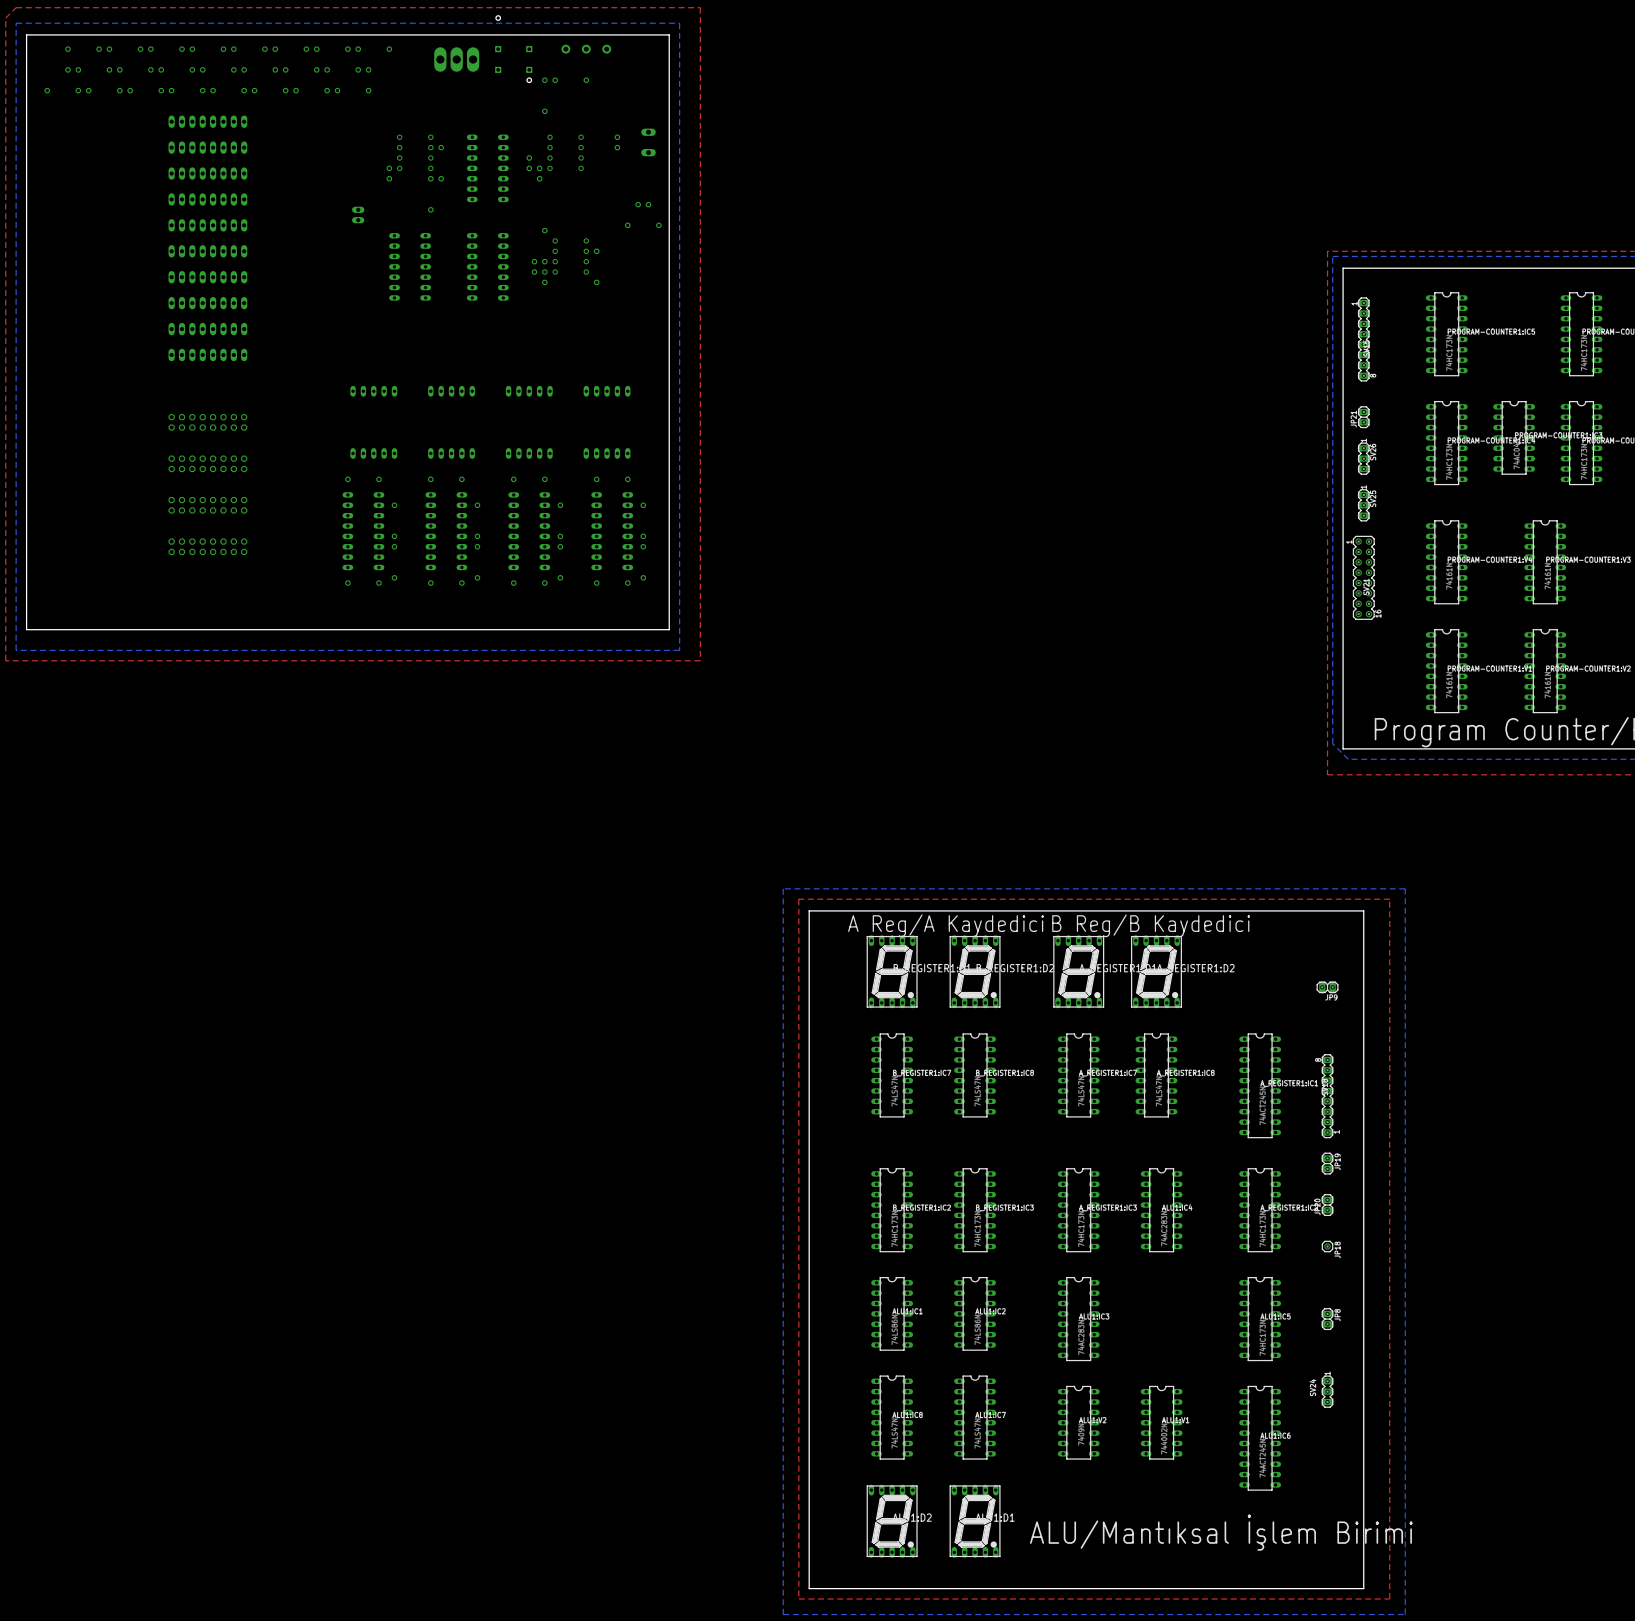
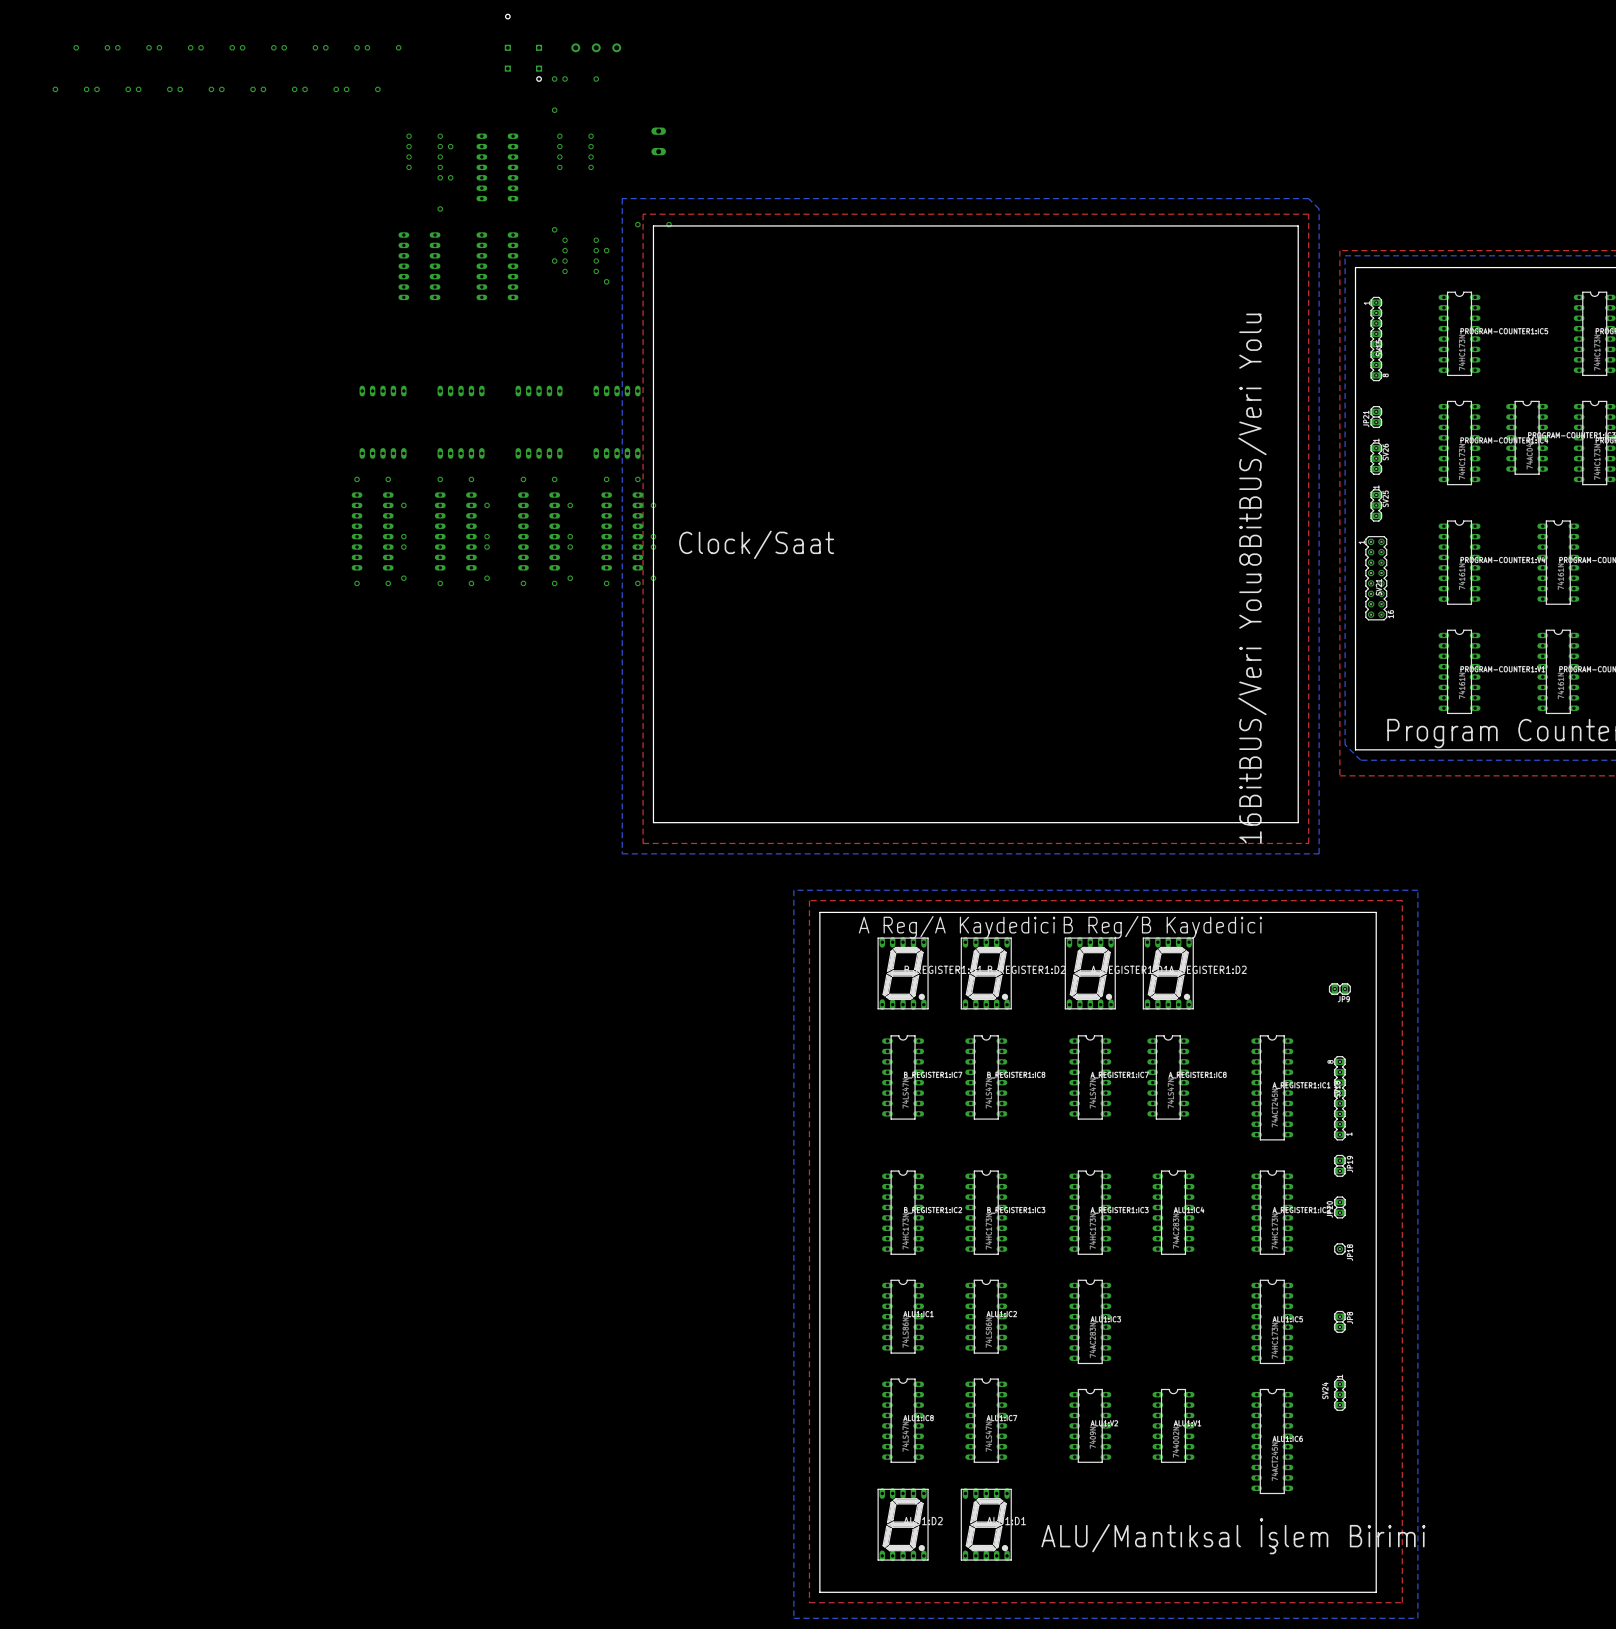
top zone outline: (16, 7) (5, 18) (5, 660) (700, 660) (700, 7) (16, 7) -> none
bottom zone outline: (16, 23) (16, 650) (679, 650) (679, 23) (16, 23) -> none
board edge: (26, 34) (26, 629) (669, 629) (669, 34) (26, 34) -> none
part: (456, 59) -> none
part: (73, 69) -> none
part: (114, 69) -> none
part: (156, 69) -> none
part: (197, 69) -> none
part: (239, 69) -> none
part: (280, 69) -> none
part: (321, 69) -> none
part: (363, 69) -> none
part: (207, 121) -> none
part: (617, 142) -> none
part: (207, 147) -> none
part: (529, 163) -> none
part: (207, 173) -> none
part: (389, 173) -> none
part: (539, 173) -> none
part: (207, 199) -> none
bottom zone outline: none -> (622, 198) (622, 853) (1319, 853) (1319, 209) (1308, 198) (622, 198)
part: (643, 204) -> none
part: (358, 215) -> none
top zone outline: none -> (643, 214) (643, 843) (1308, 843) (1308, 214) (643, 214)
part: (207, 225) -> none
board edge: none -> (653, 225) (1298, 225) (1298, 822) (653, 822) (653, 225)
part: (207, 251) -> none
part: (534, 266) -> none
part: (207, 277) -> none
part: (544, 277) -> none
part: (207, 303) -> none
part: (207, 329) -> none
part: (207, 354) -> none
part: (207, 422) -> none
text: none -> 8BitBUS/Veri Yolu (1252, 439)
part: (207, 463) -> none
part: (207, 505) -> none
text: none -> Clock/Saat (756, 544)
part: (207, 546) -> none
text: none -> 16BitBUS/Veri Yolu (1252, 708)

